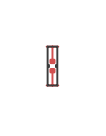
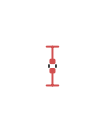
line: (47, 46) (57, 46) (57, 85) (47, 85) (47, 46) -> none

